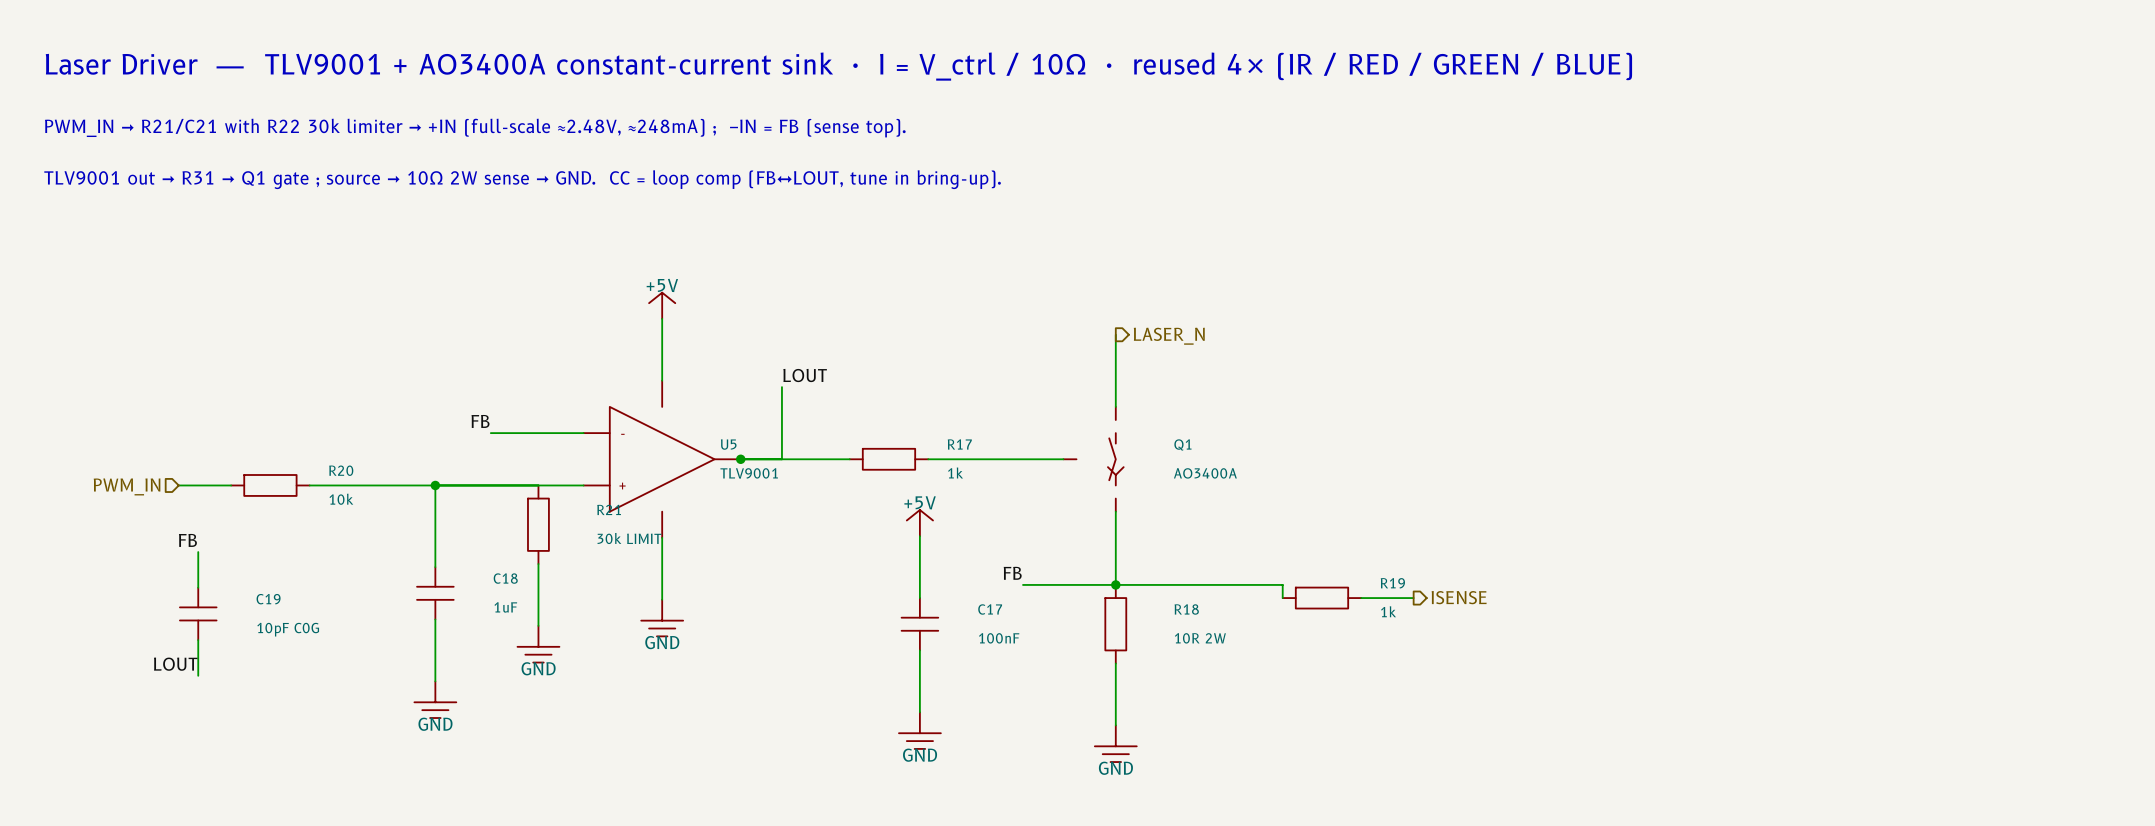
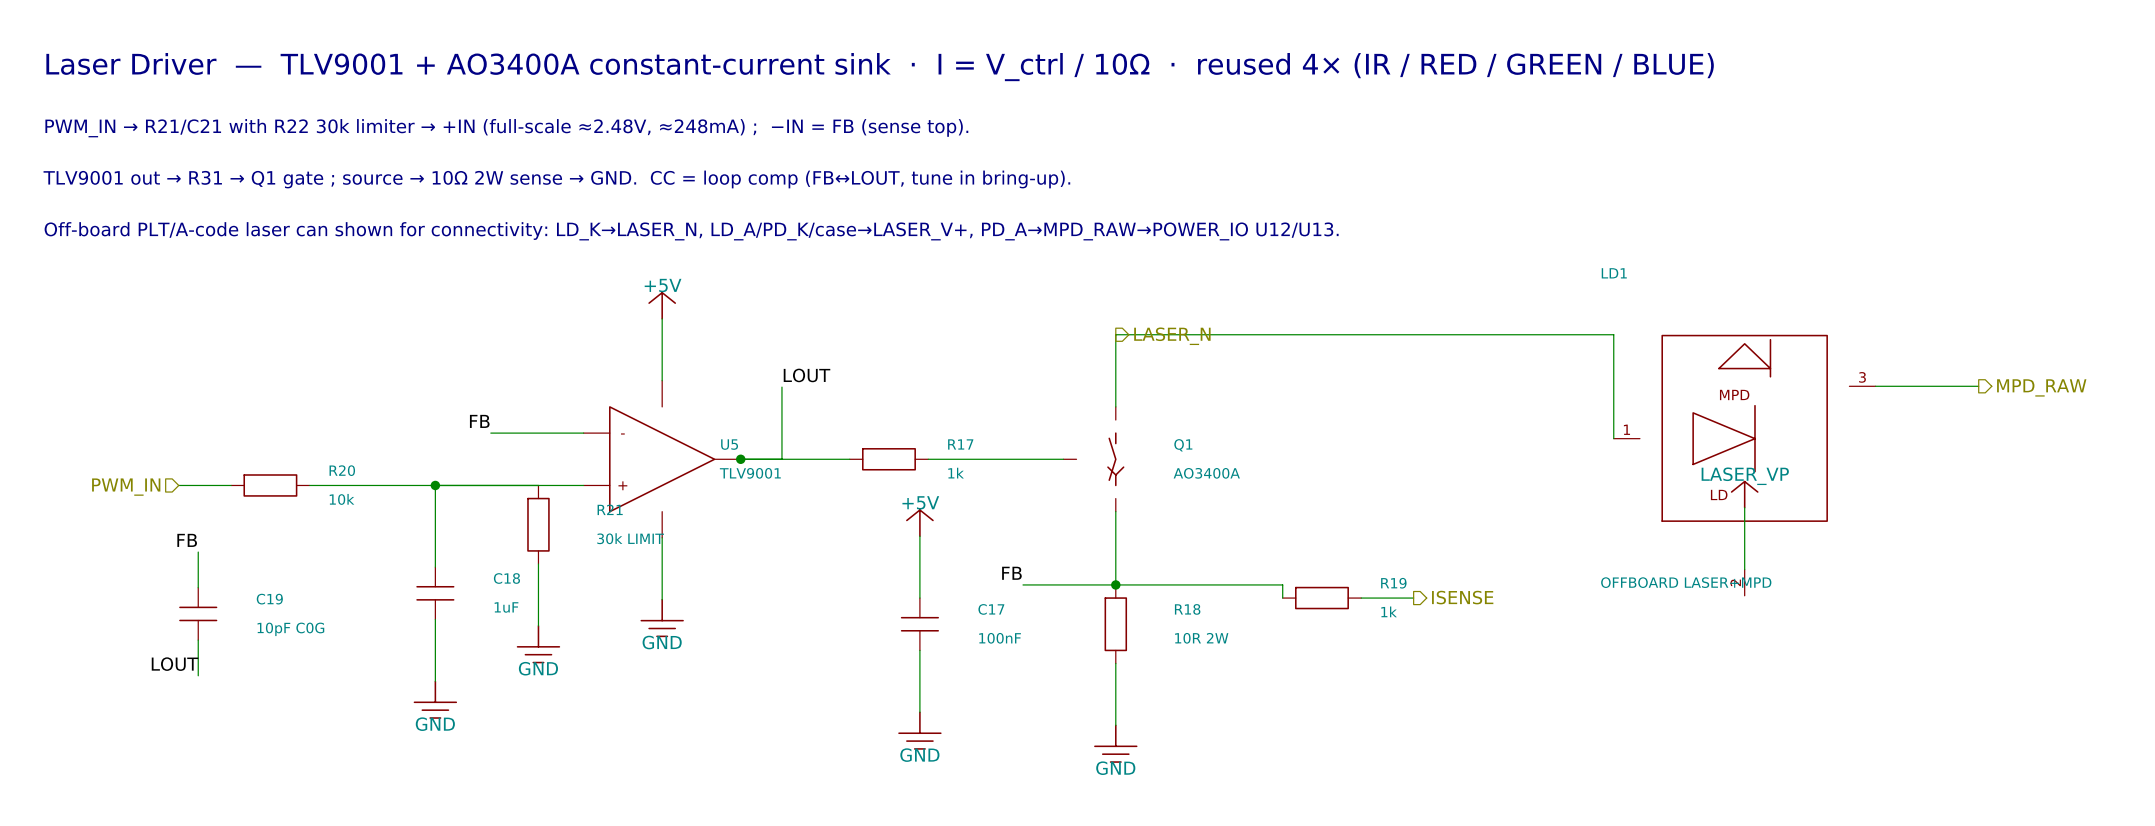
text: none -> Off-board PLT/A-code laser can shown for connectivity: LD_K→LASER_N, LD_A/PD_K/case→LASER_V+, PD_A→MPD_RAW→POWER_IO U12/U13. (691, 231)
wire: none -> (1115, 334) (1613, 334) (1613, 438)
wire: none -> (1875, 386) (1978, 386)
hierarchical label: none -> MPD_RAW (2041, 387)
LD1: none -> OFFBOARD LASER+MPD (1744, 465)
power symbol: none -> LASER_VP (1744, 494)
wire: none -> (1744, 507) (1744, 569)

